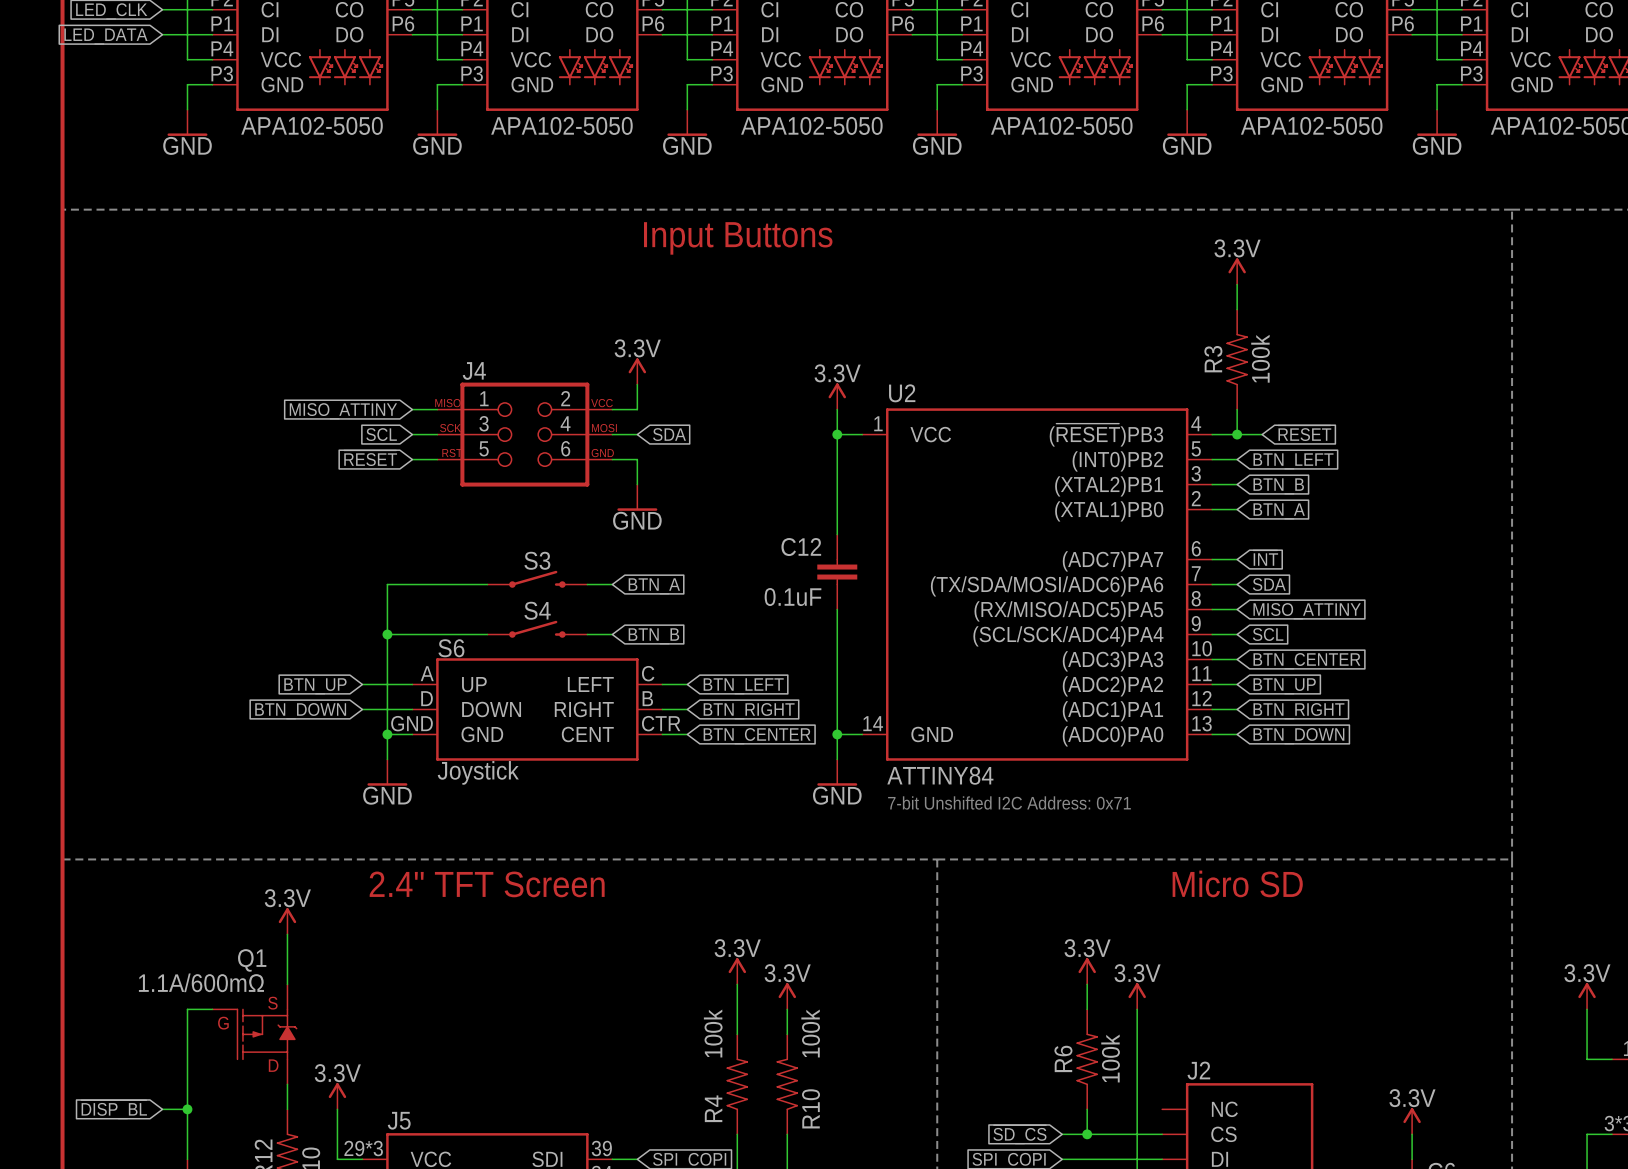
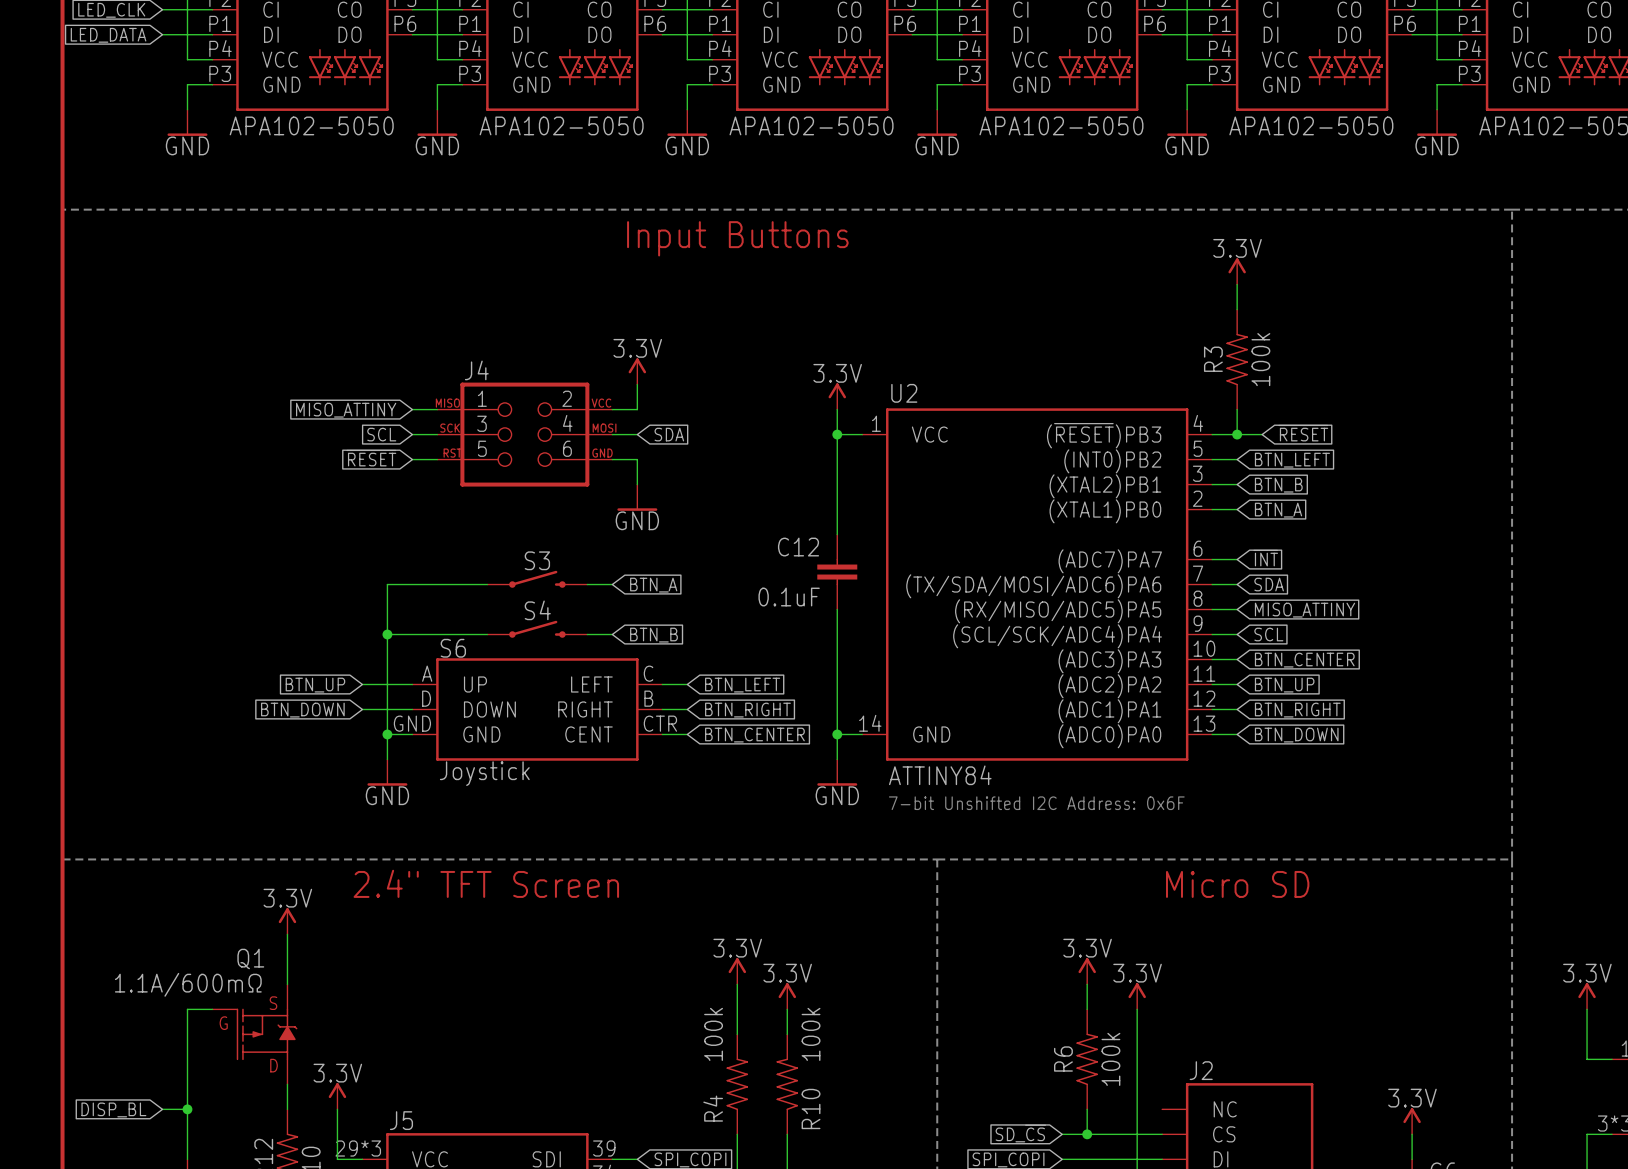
text: 7-bit Unshifted I2C Address: 0x71 (1009, 802) -> 7-bit Unshifted I2C Address: 0x6F (1036, 803)
global label: ~{DISP_BL} (114, 1109) -> DISP_BL (113, 1109)
global label: ~{SD_CS} (1019, 1134) -> SD_~{CS} (1020, 1133)

